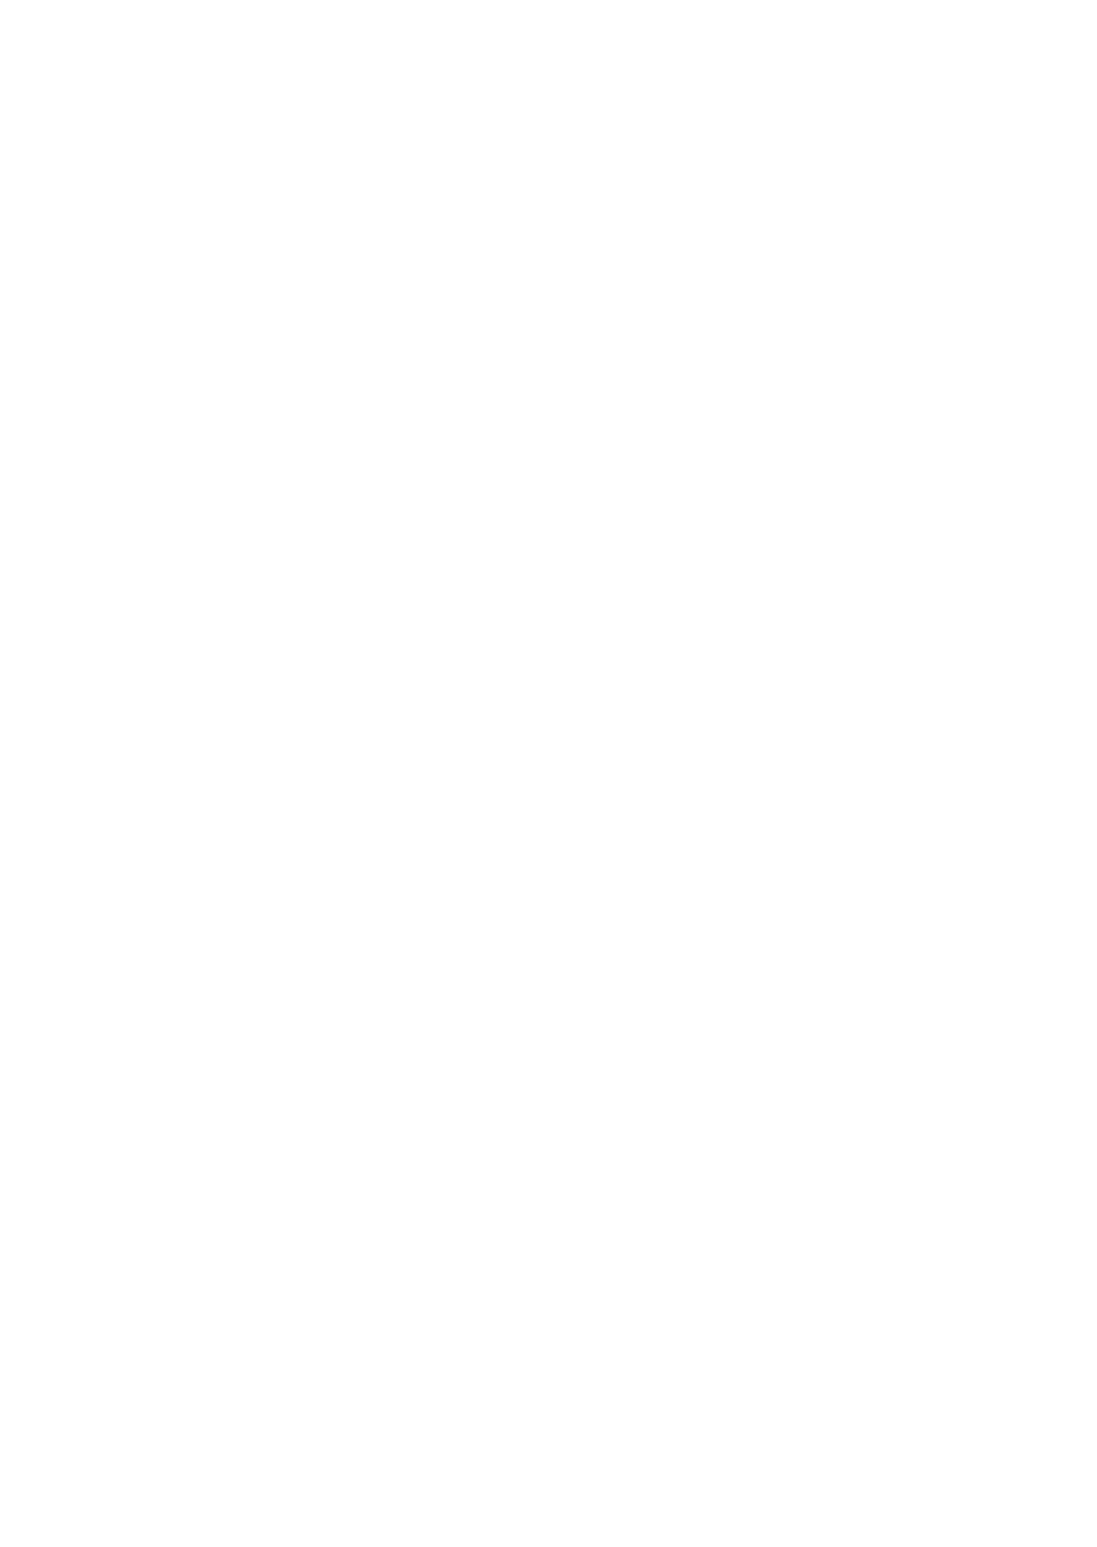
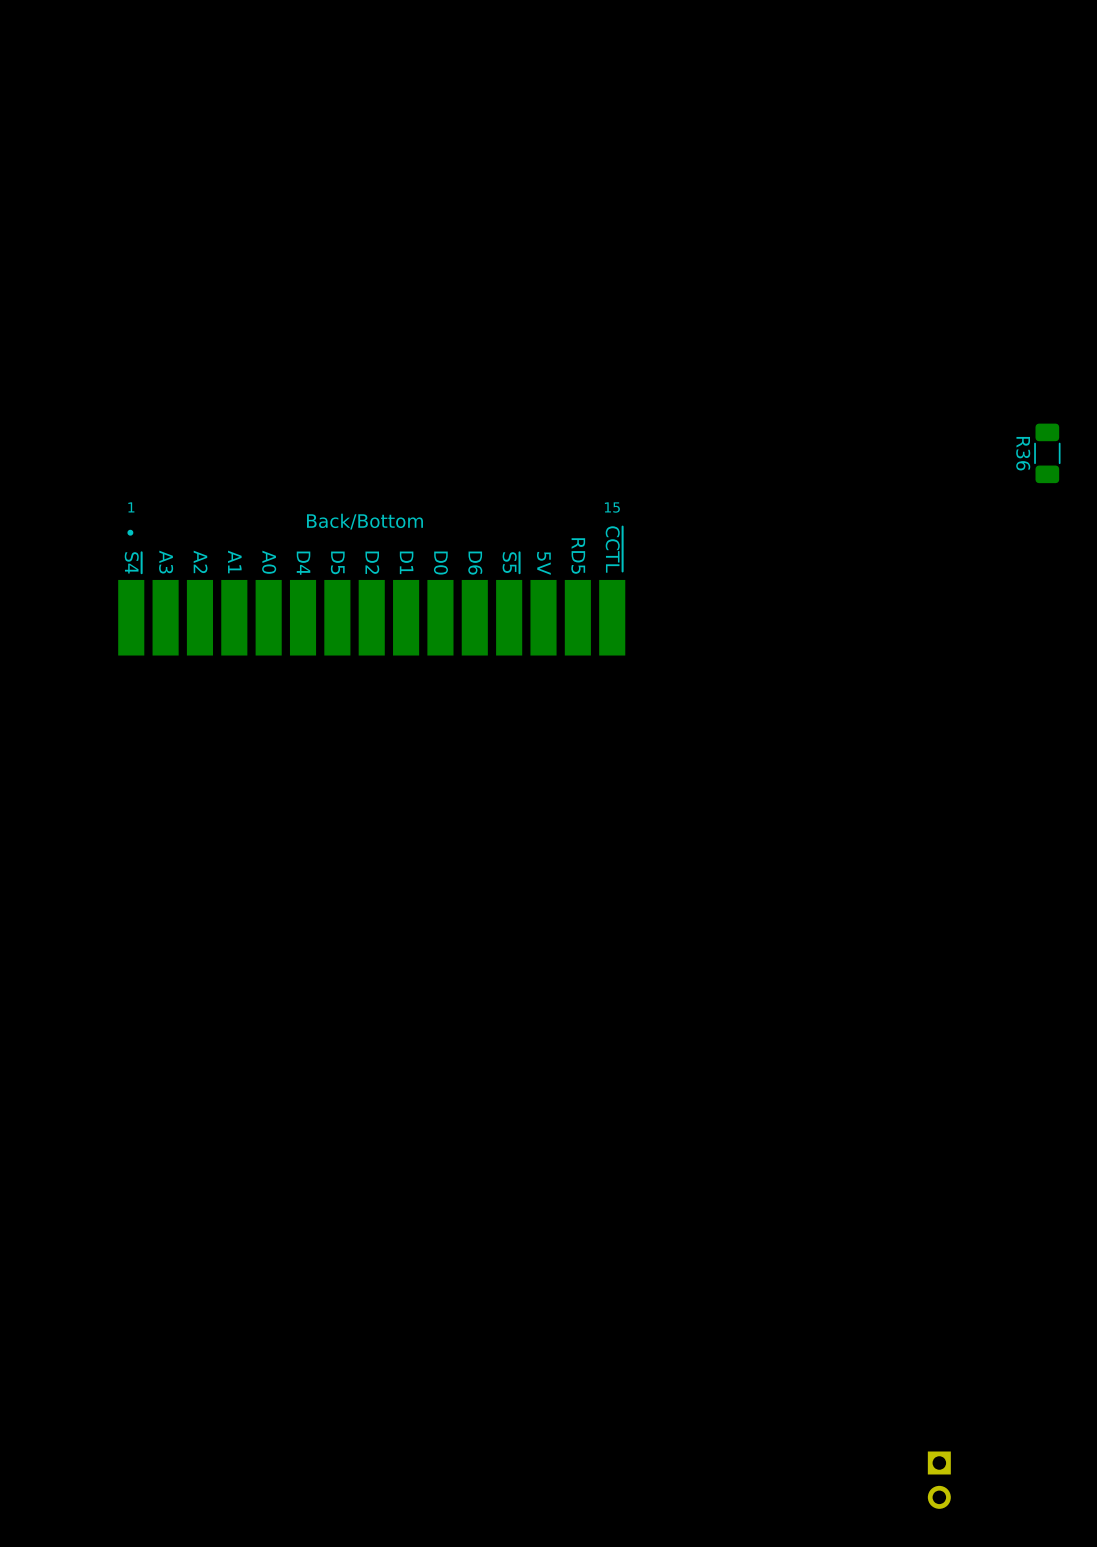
R36: none -> (1047, 453)
part: none -> (371, 592)
part: none -> (939, 1480)

